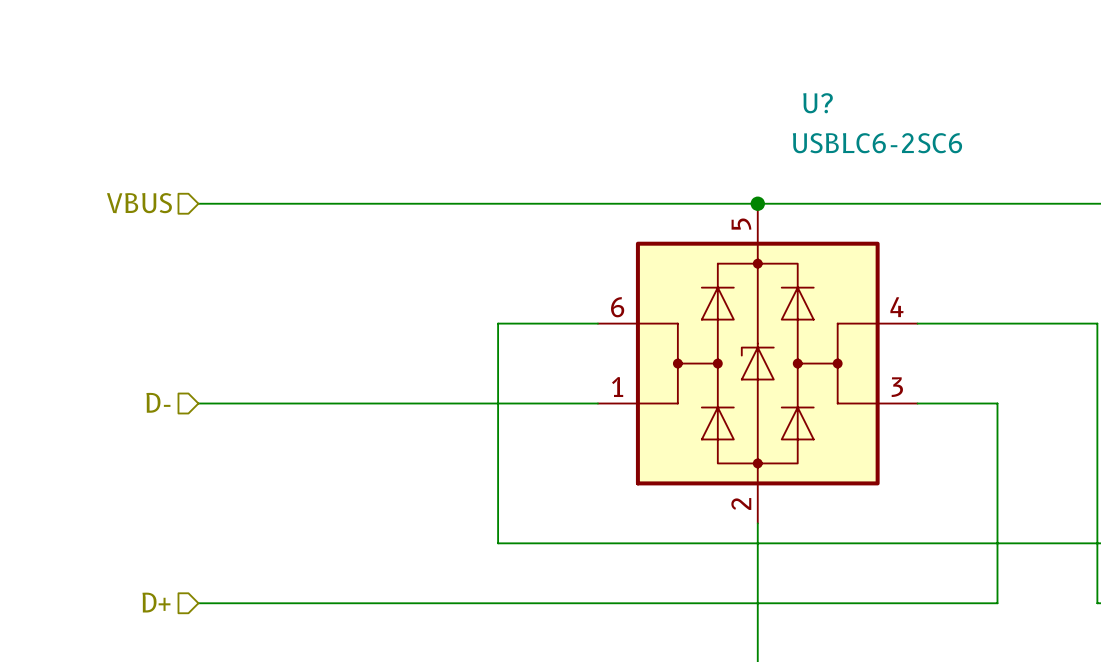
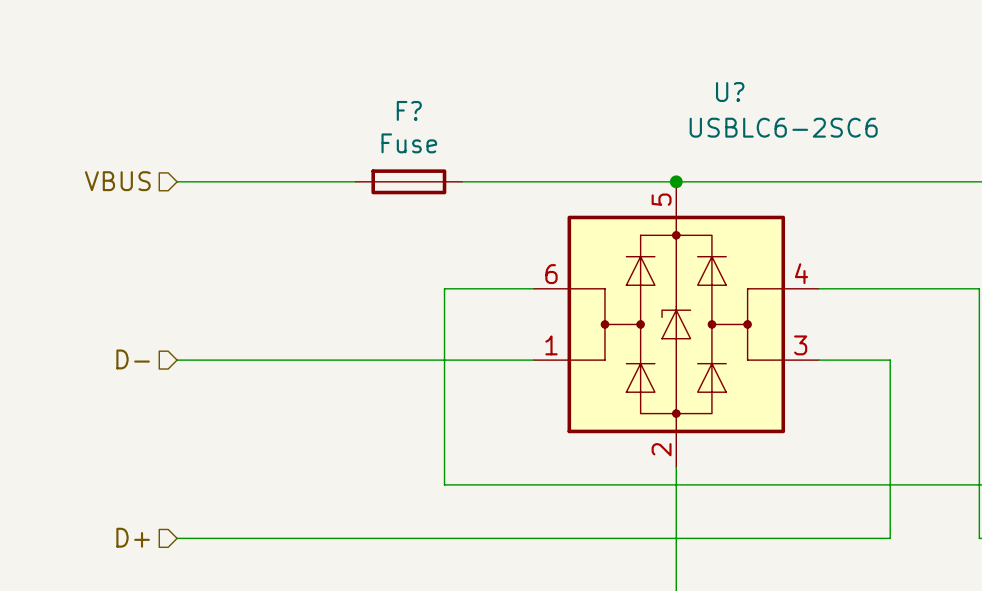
F?: none -> Fuse (408, 181)

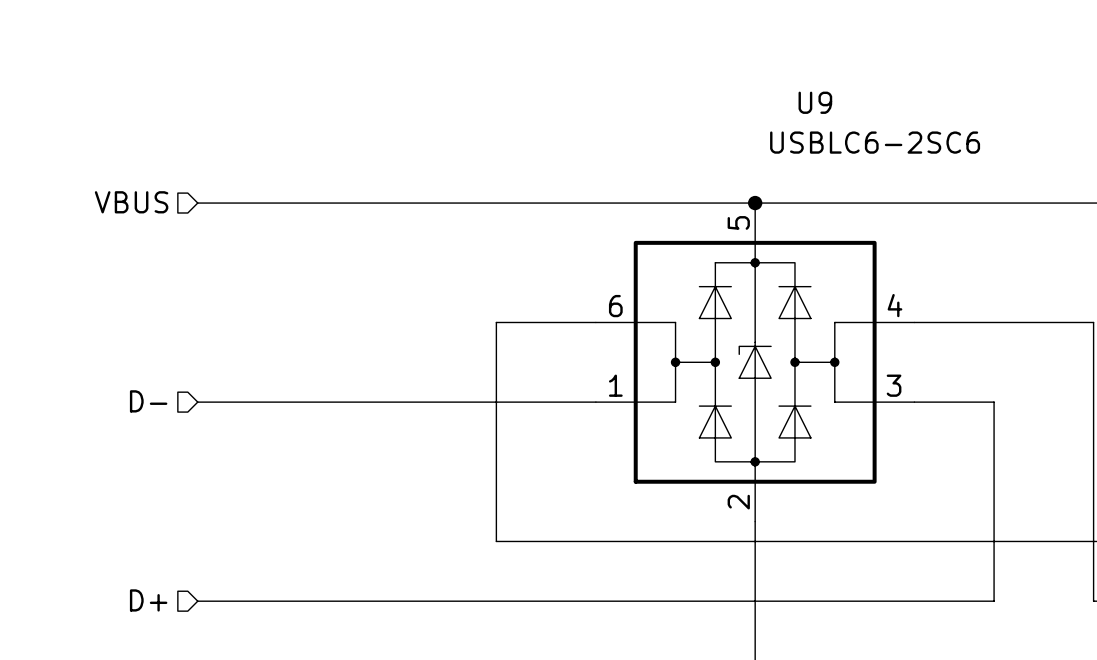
U? name: U? (730, 92) -> U9 (815, 102)
F?: Fuse (408, 181) -> none

